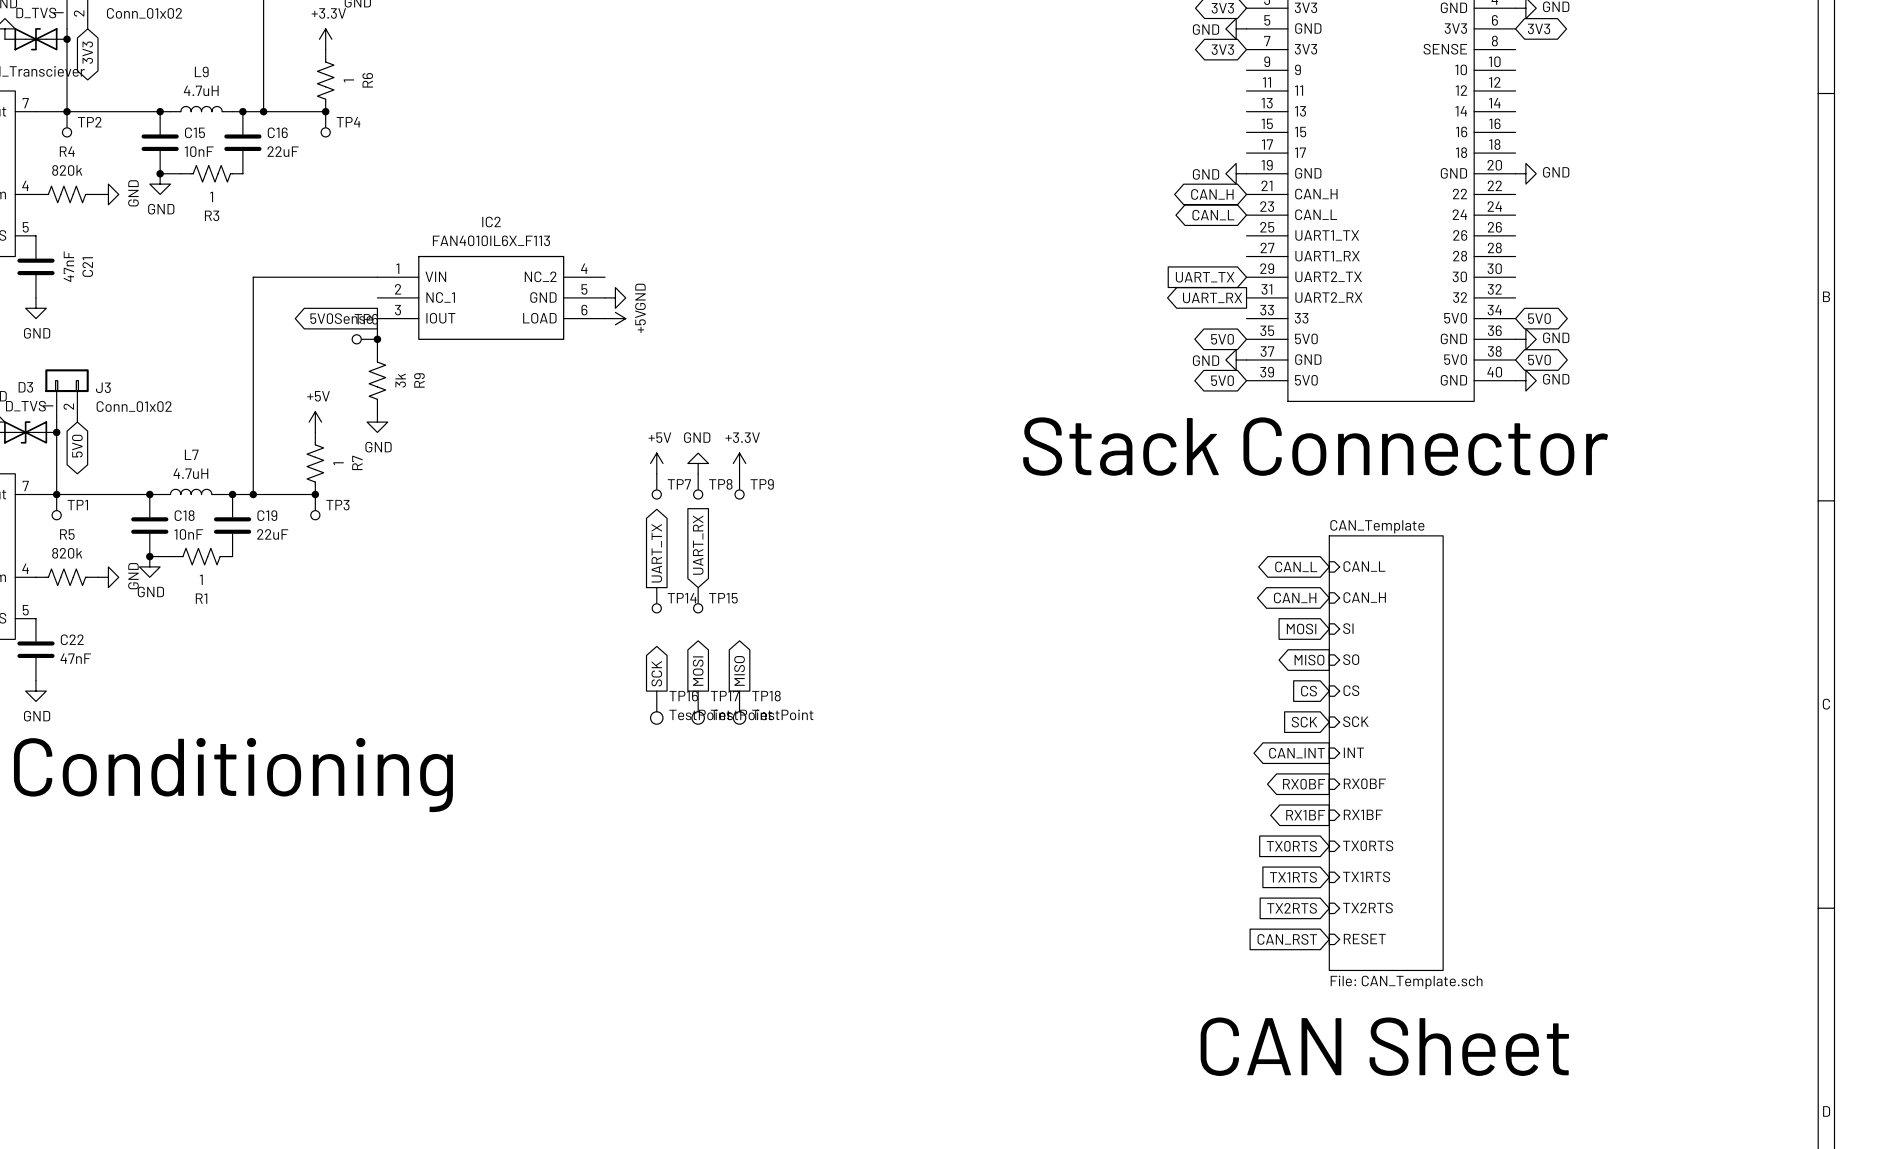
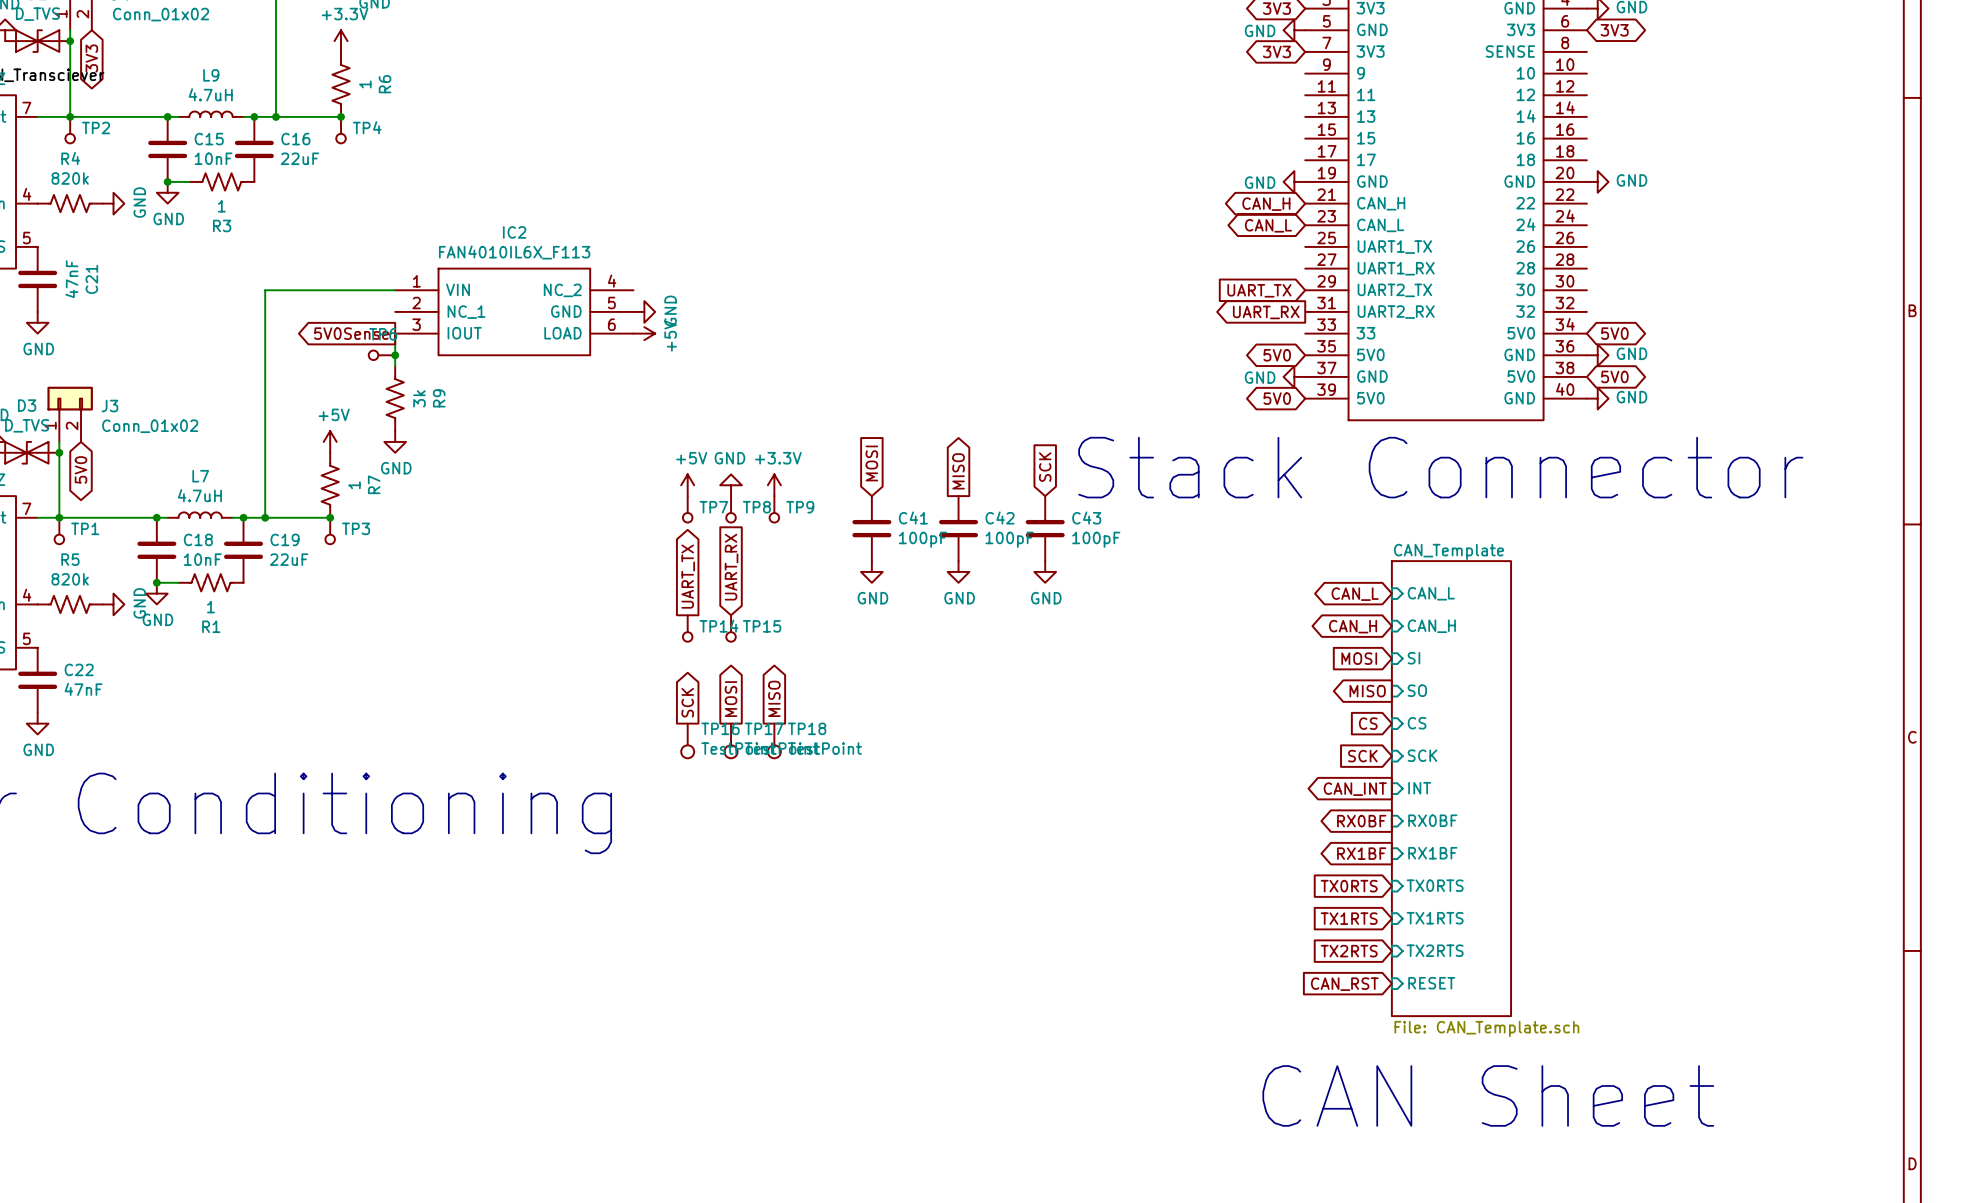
global label: none -> MOSI (871, 463)
global label: none -> SCK (1045, 467)
global label: none -> MISO (958, 471)
C41: none -> 100pF (871, 528)
C42: none -> 100pF (958, 528)
C43: none -> 100pF (1045, 528)
power symbol: none -> GND (871, 571)
power symbol: none -> GND (958, 571)
power symbol: none -> GND (1045, 571)

